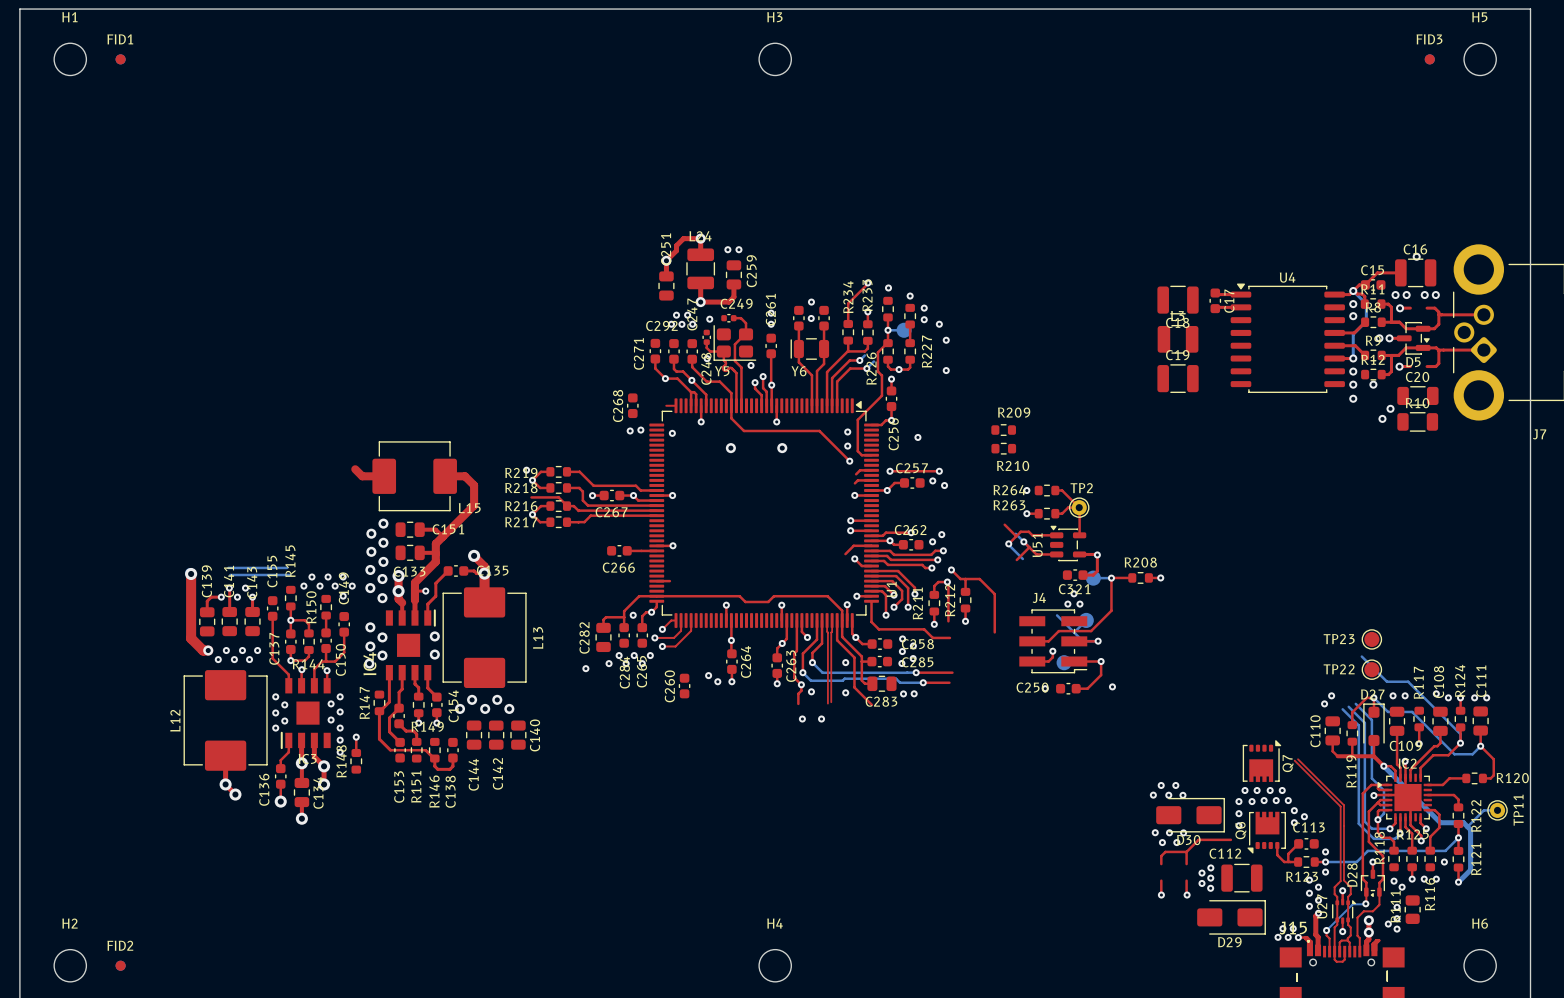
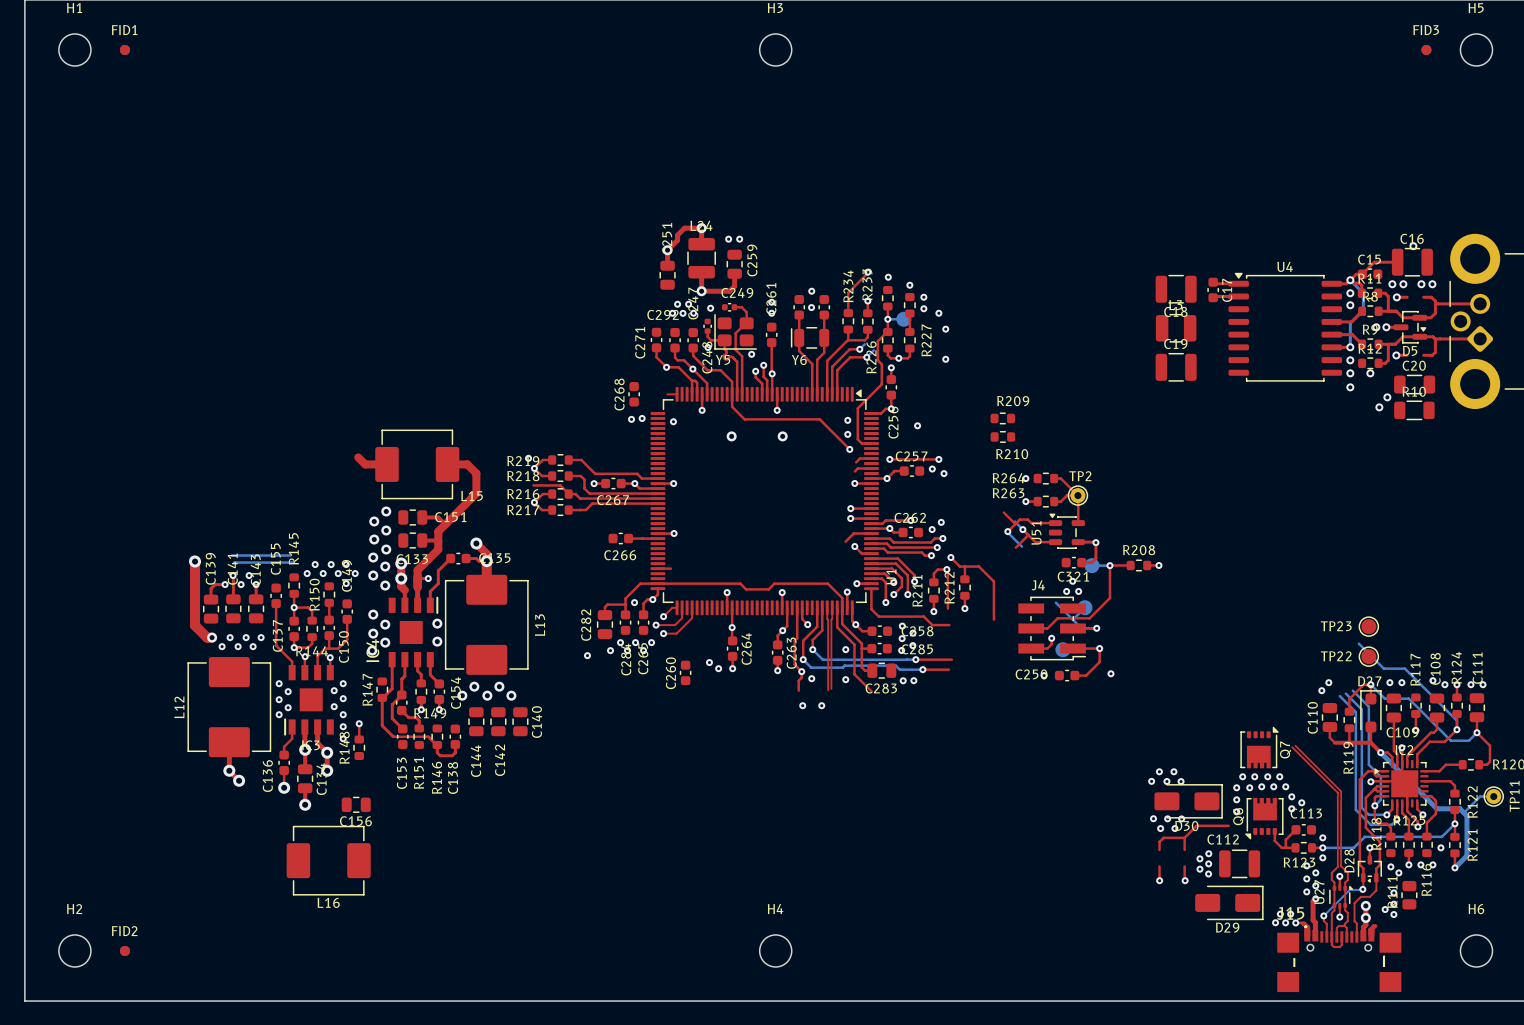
C156: none -> (356, 804)
L16: none -> (328, 860)

